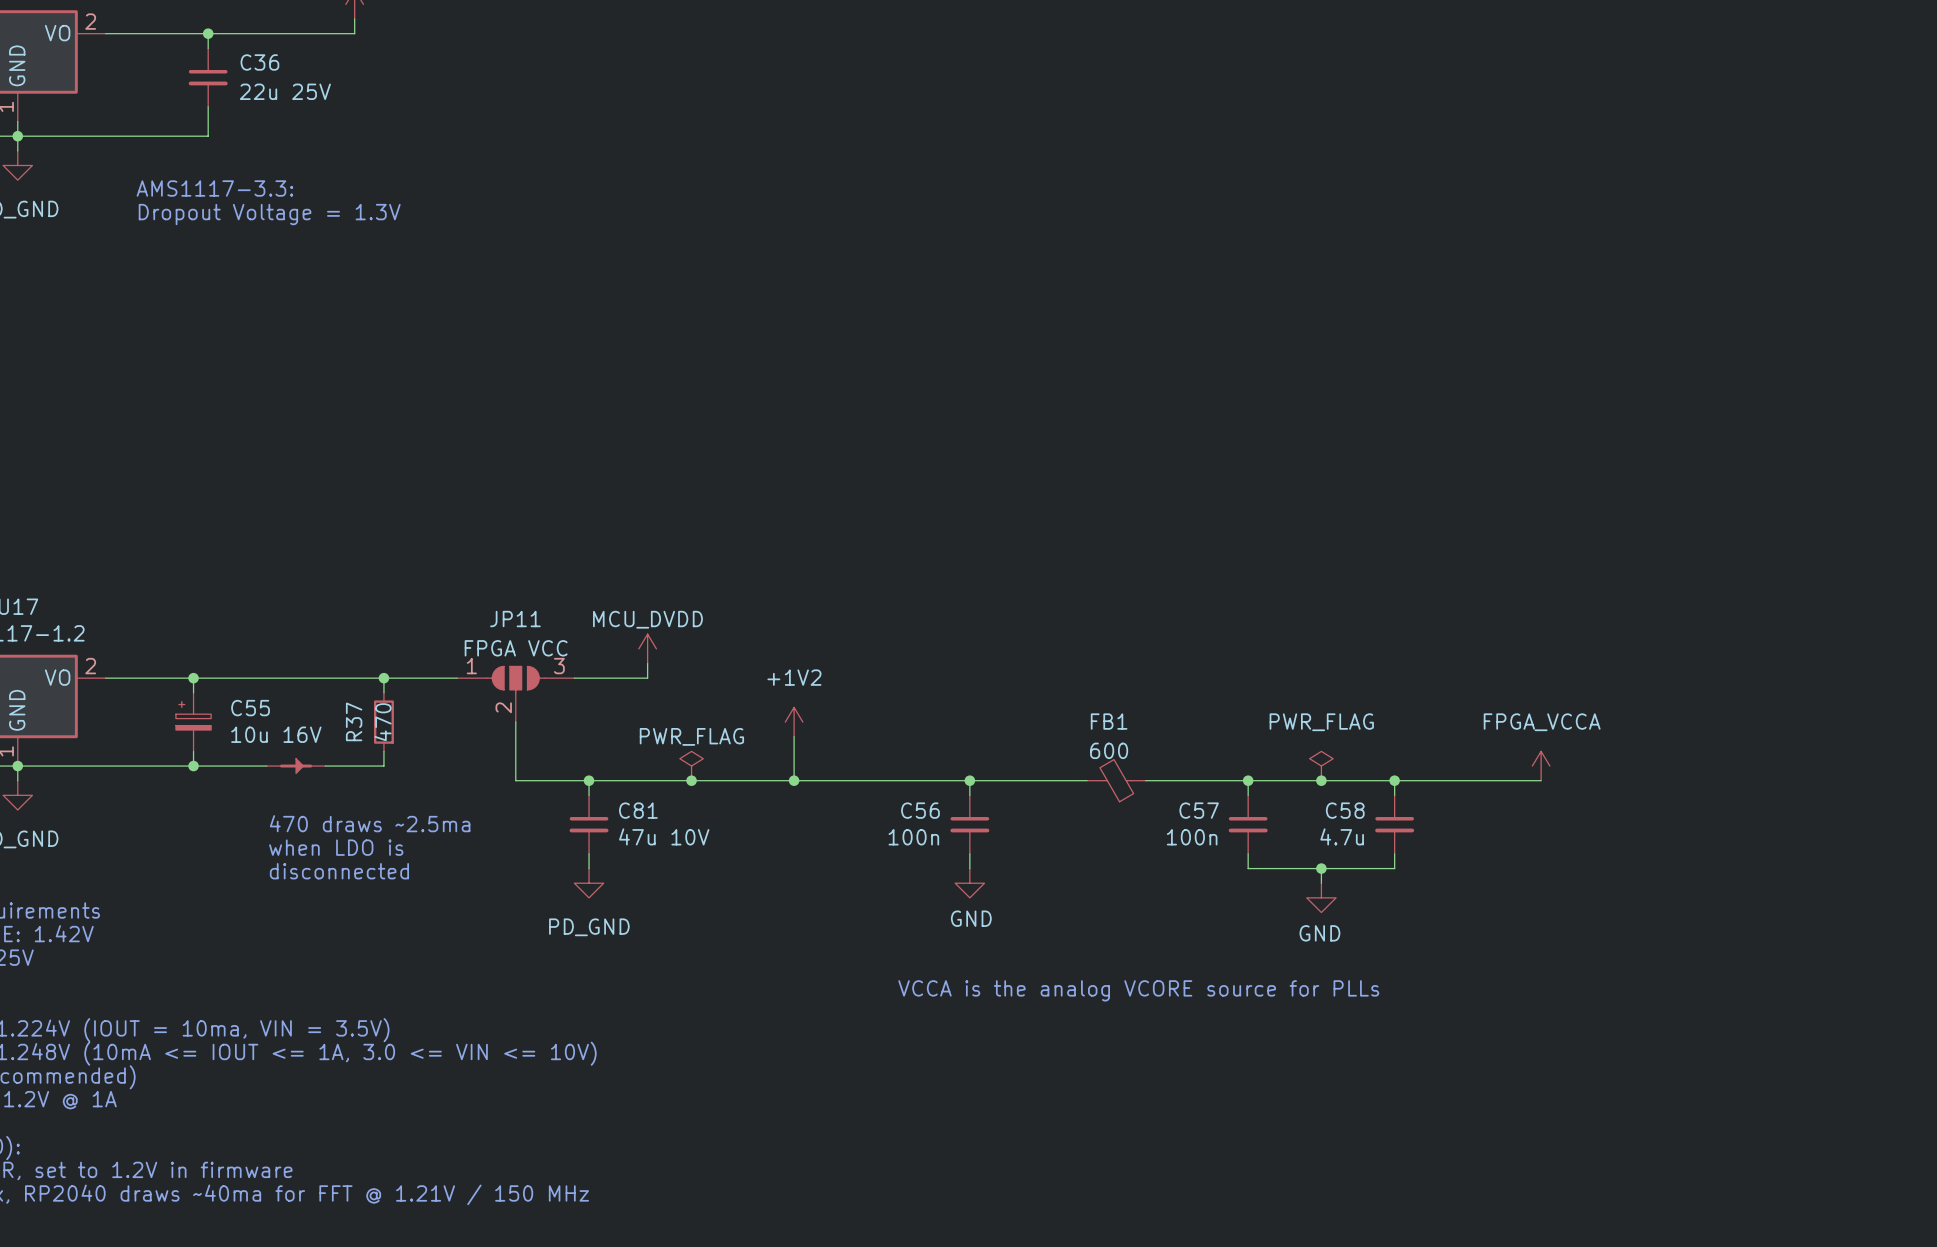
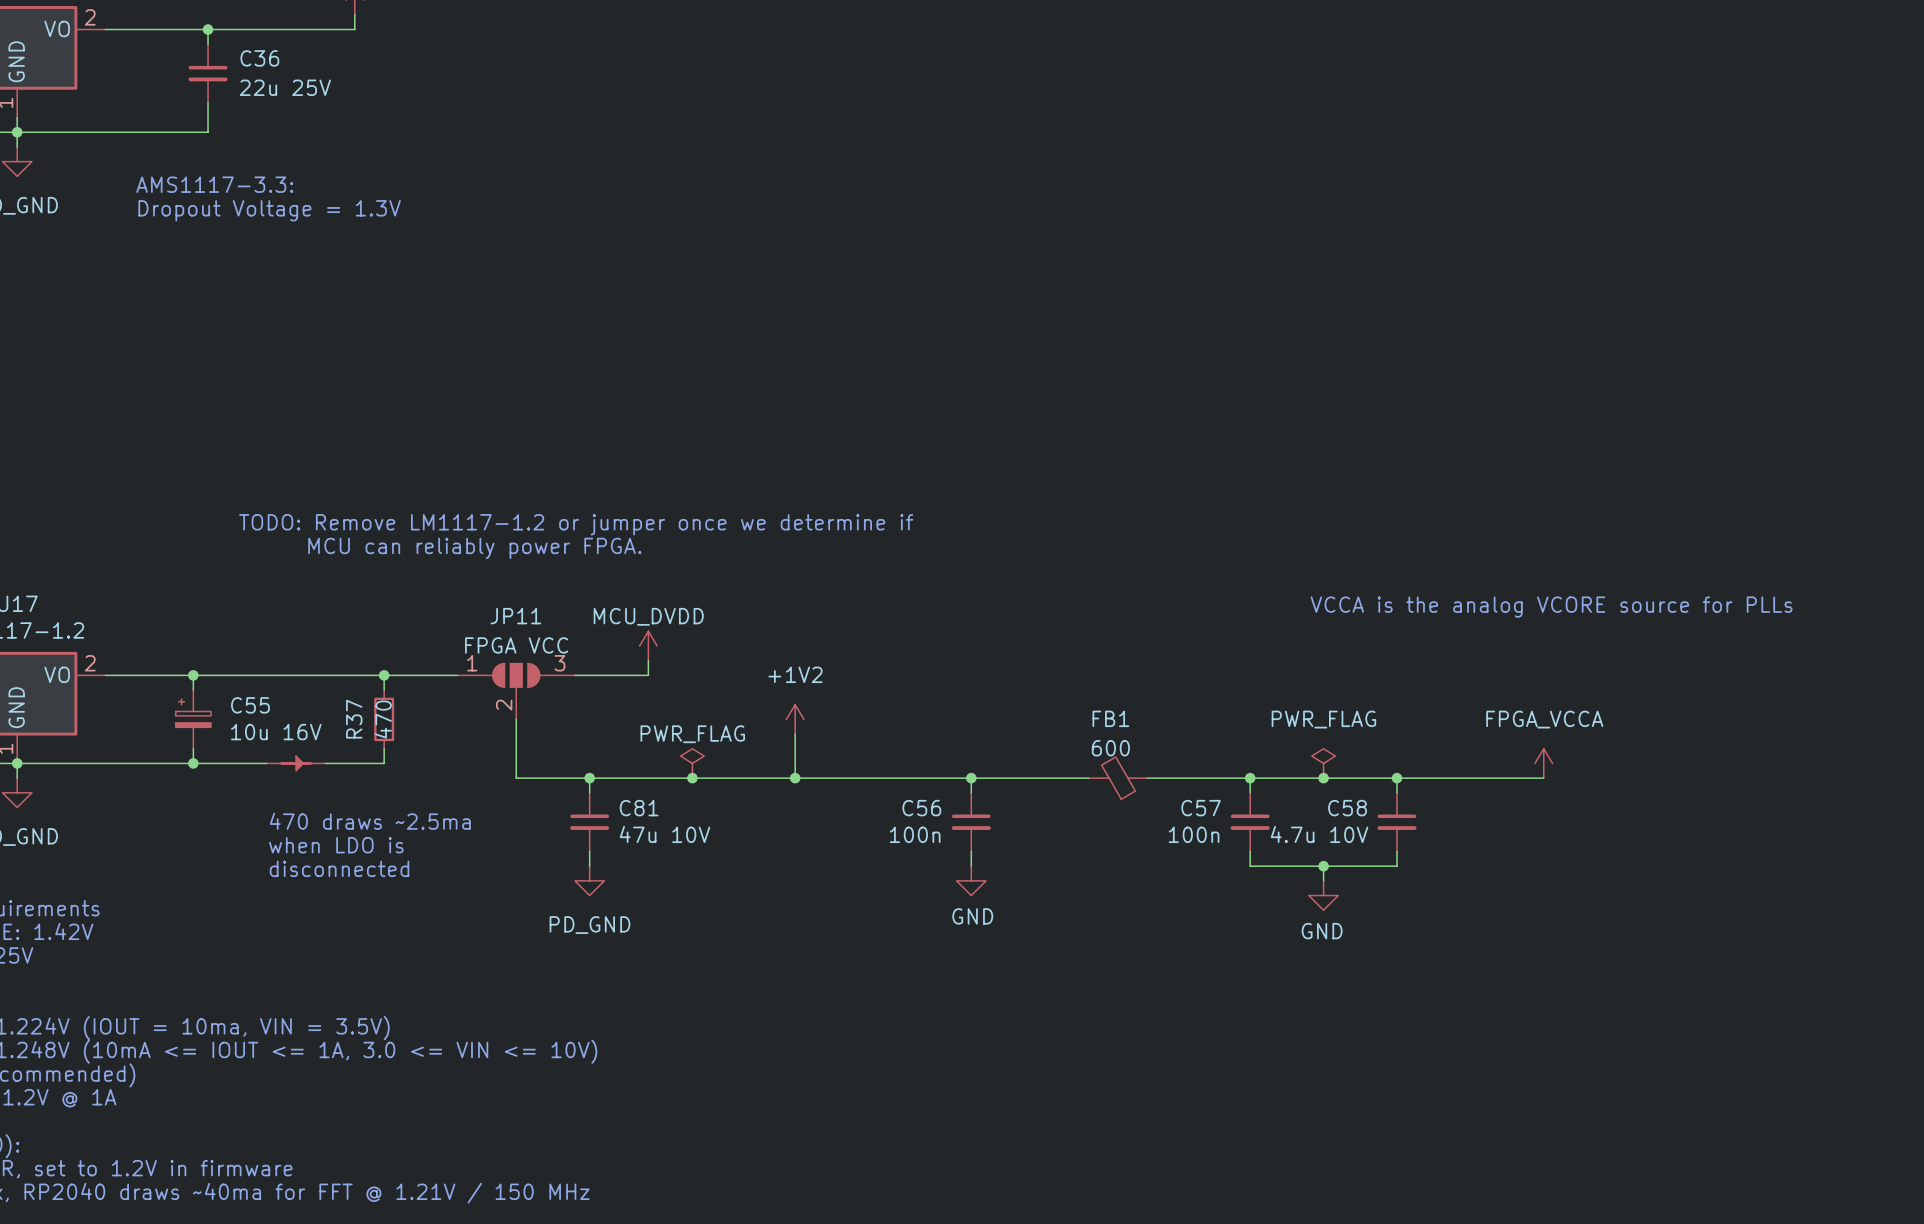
text: none -> TODO: Remove LM1117-1.2 or jumper once we determine if (576, 524)
text: none -> MCU can reliably power FPGA. (474, 548)
text: none -> VCCA is the analog VCORE source for PLLs (1551, 607)
C58 value: 4.7u (1342, 836) -> 4.7u 10V (1319, 834)
text: VCCA is the analog VCORE source for PLLs (1138, 990) -> none

